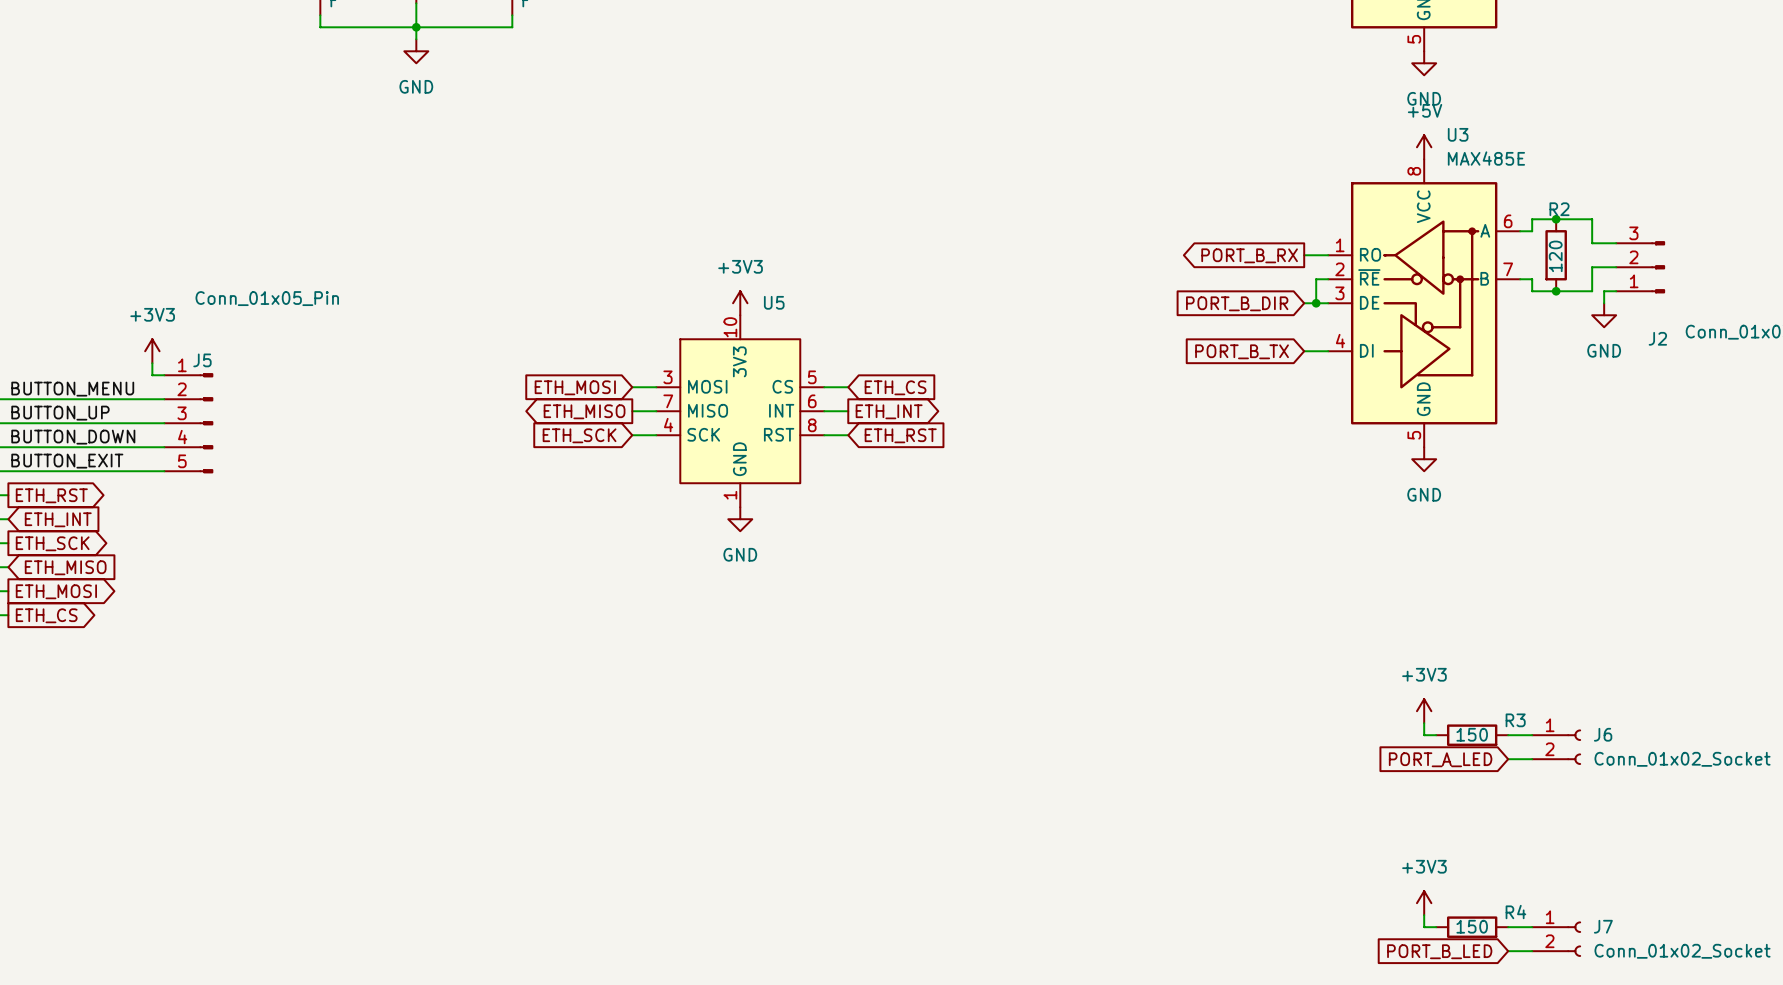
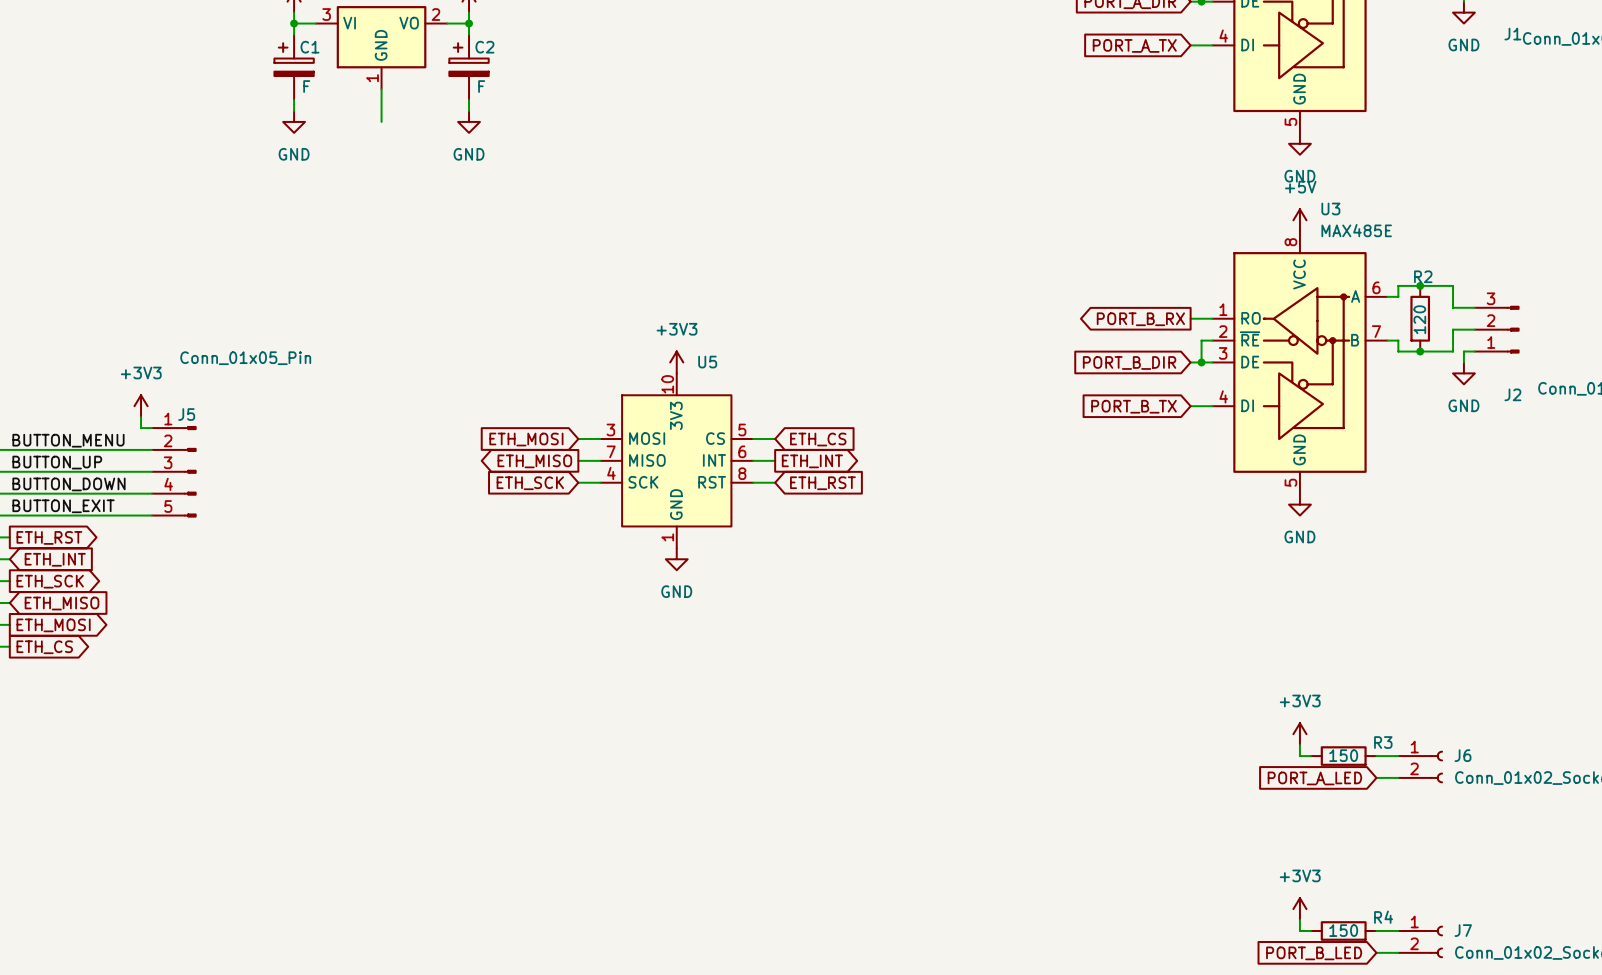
wire: (320, 27) (512, 27) -> none
junction: (416, 27) -> none
power symbol: none -> GND (294, 121)
power symbol: none -> GND (469, 121)
power symbol: GND (416, 51) -> none

